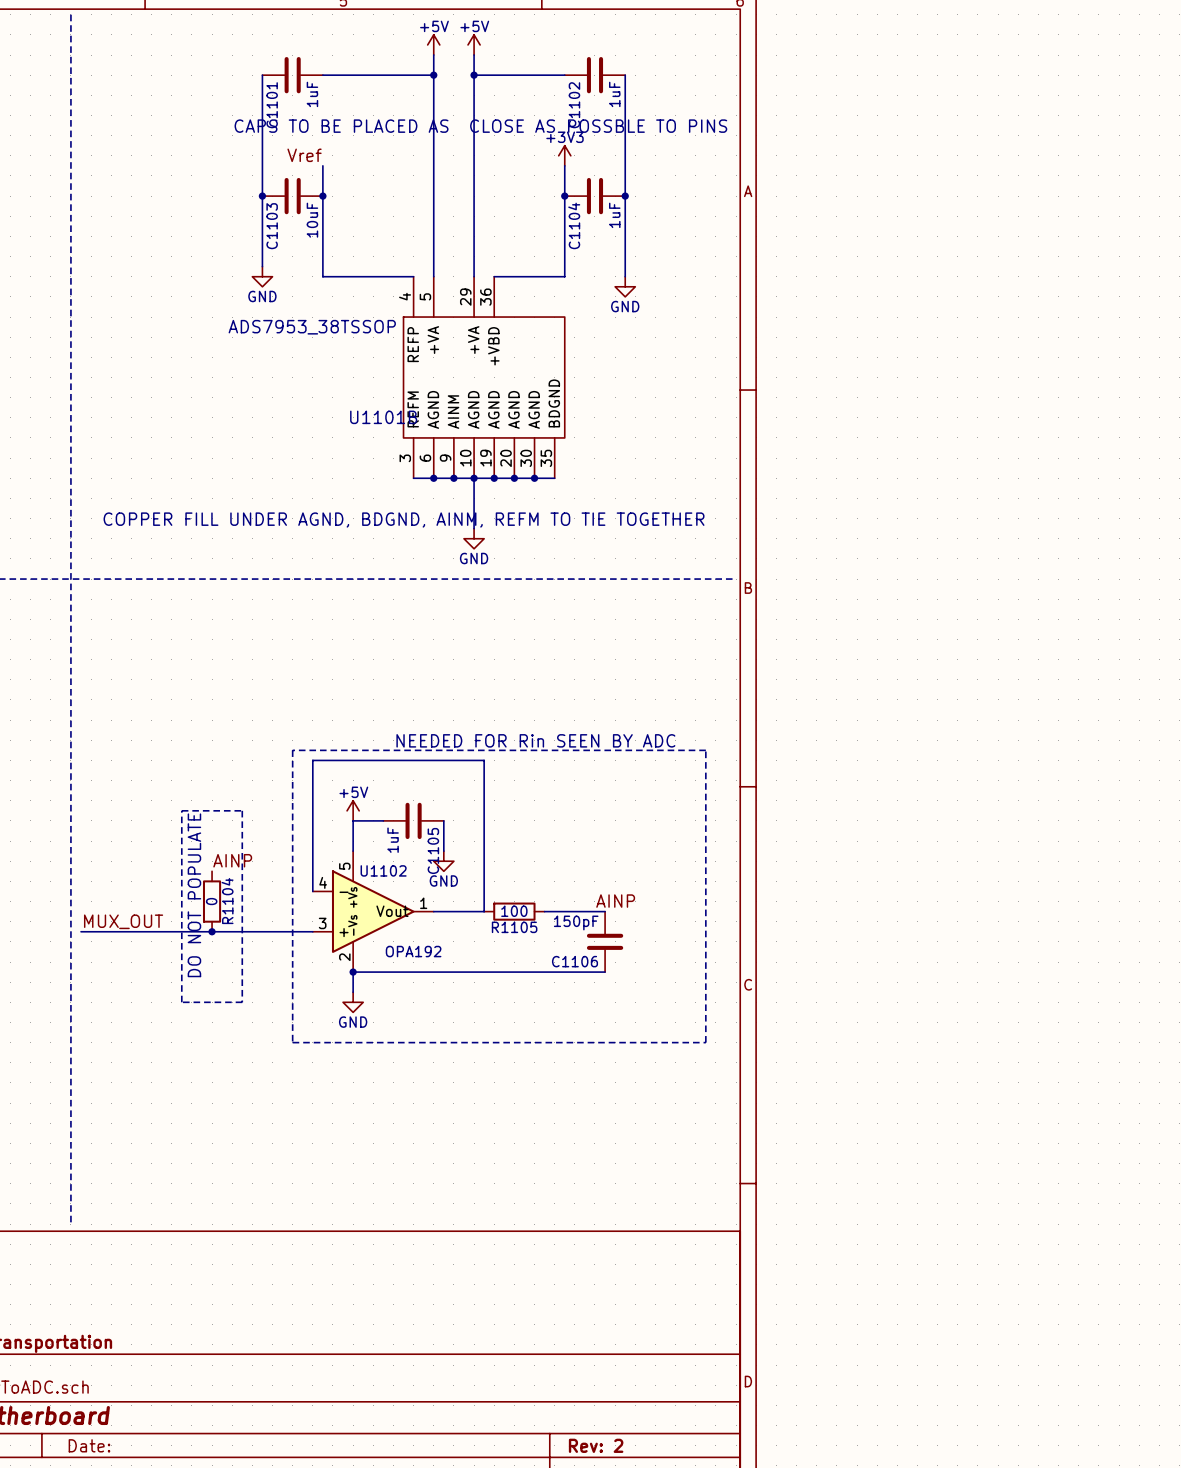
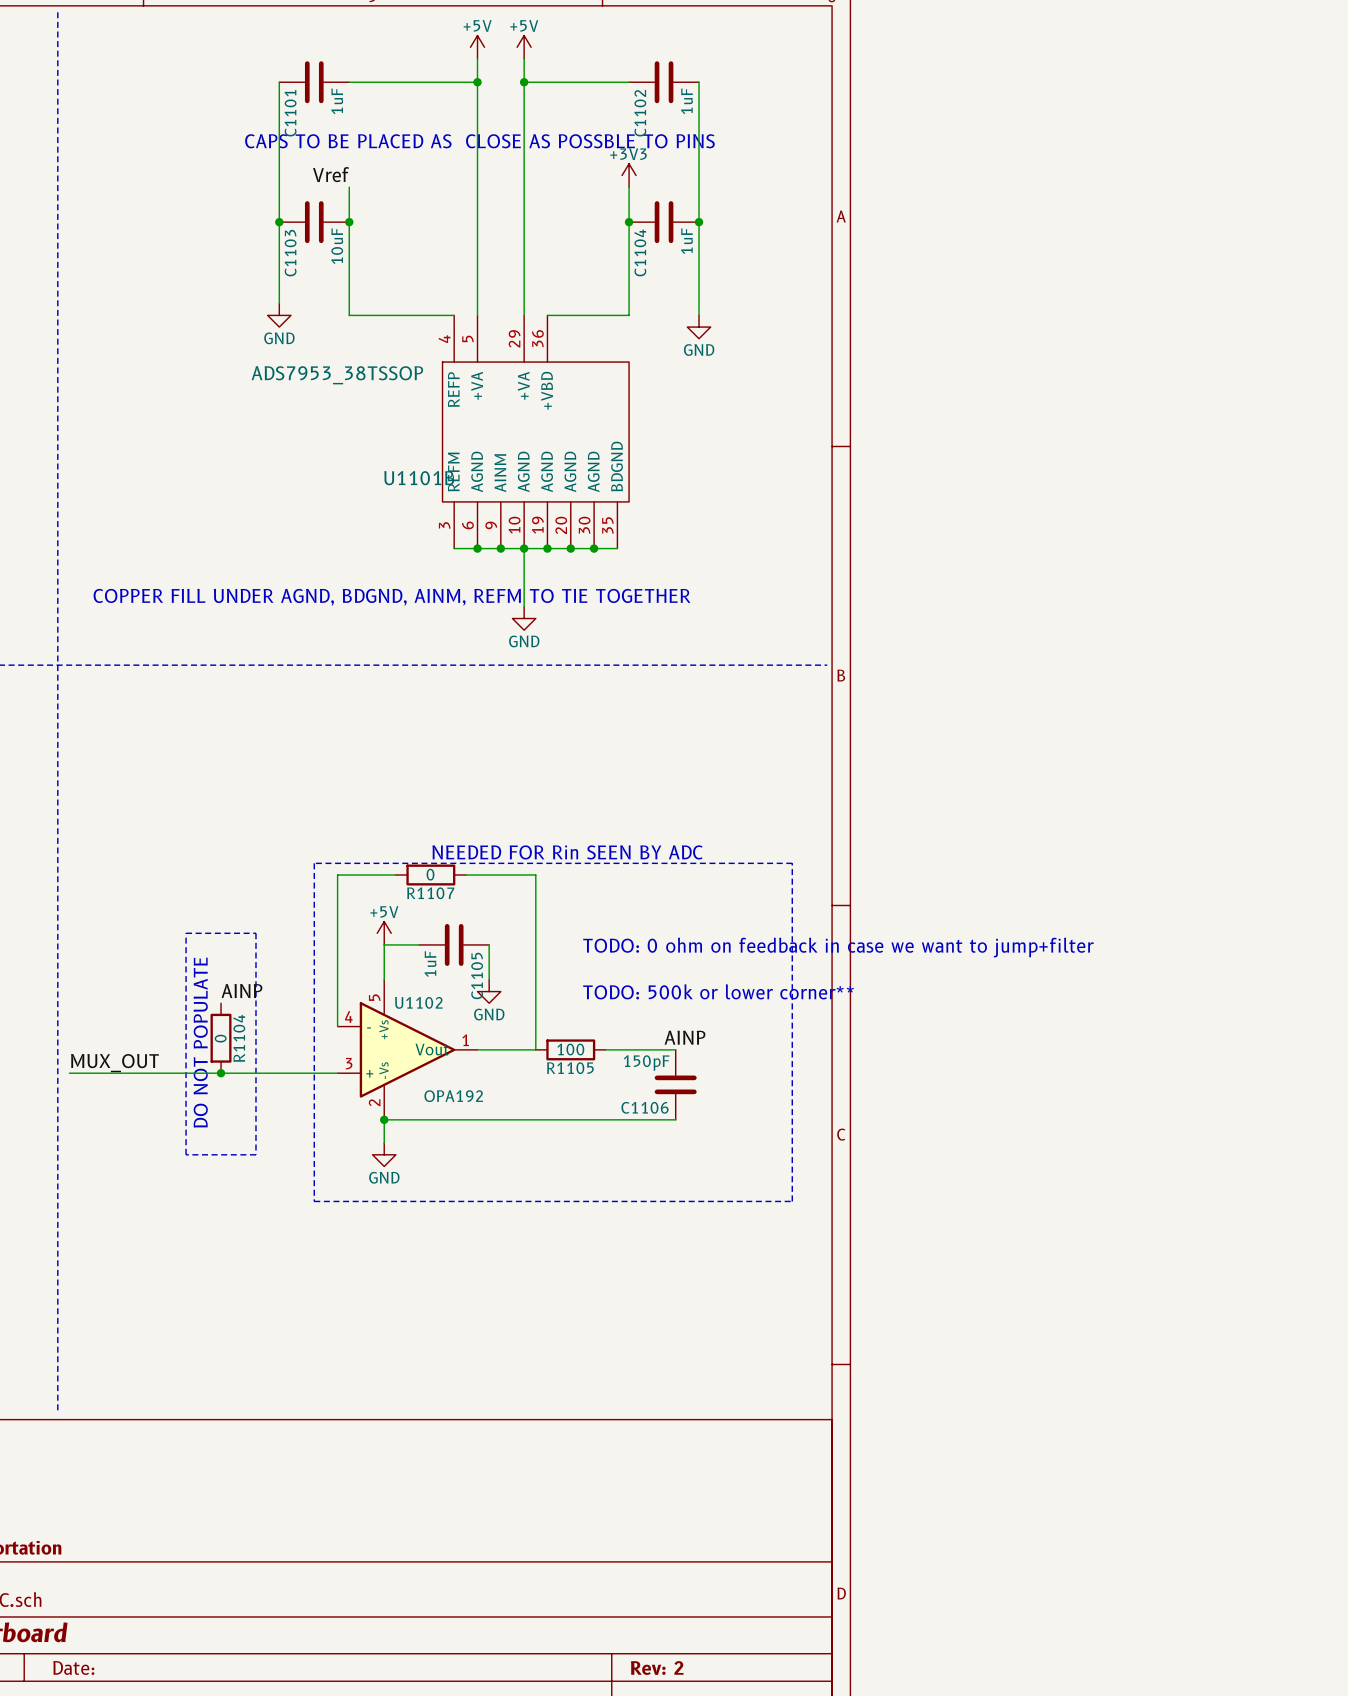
wire: (363, 760) (423, 760) -> none
R1107: none -> 0 (430, 875)
text: none -> TODO: 0 ohm on feedback in case we want to jump+filter (838, 947)
text: none -> TODO: 500k or lower corner** (718, 991)

